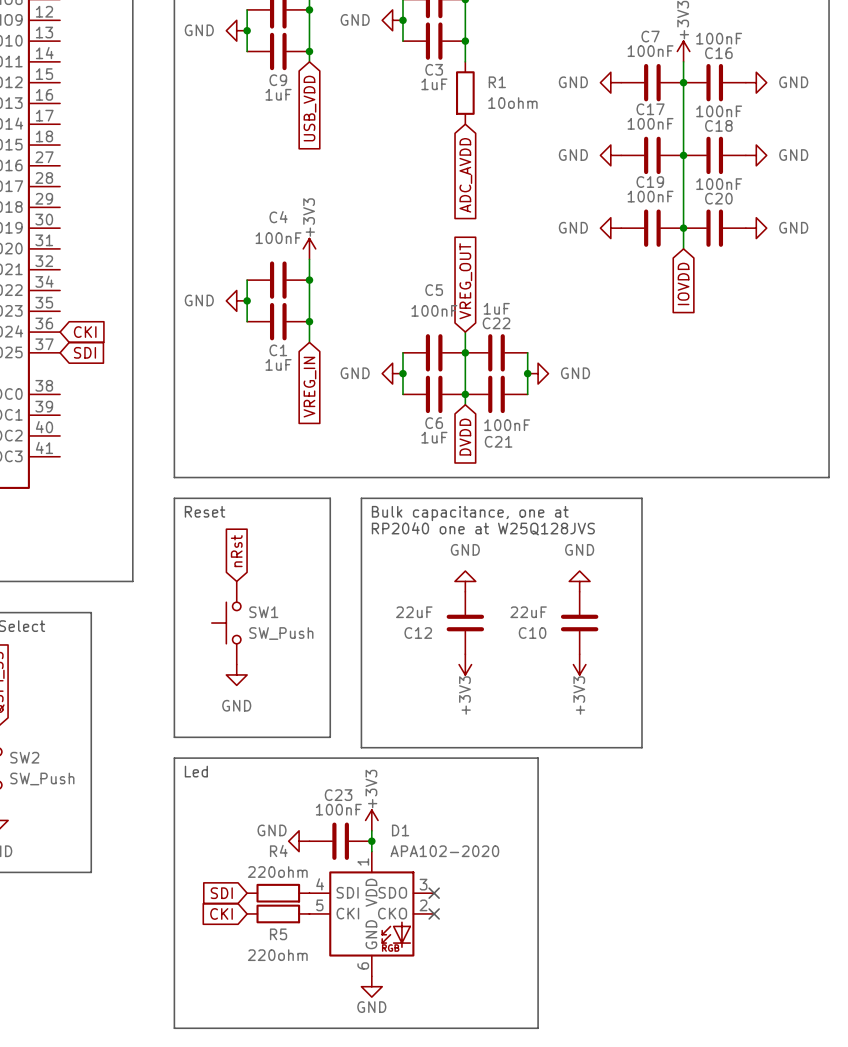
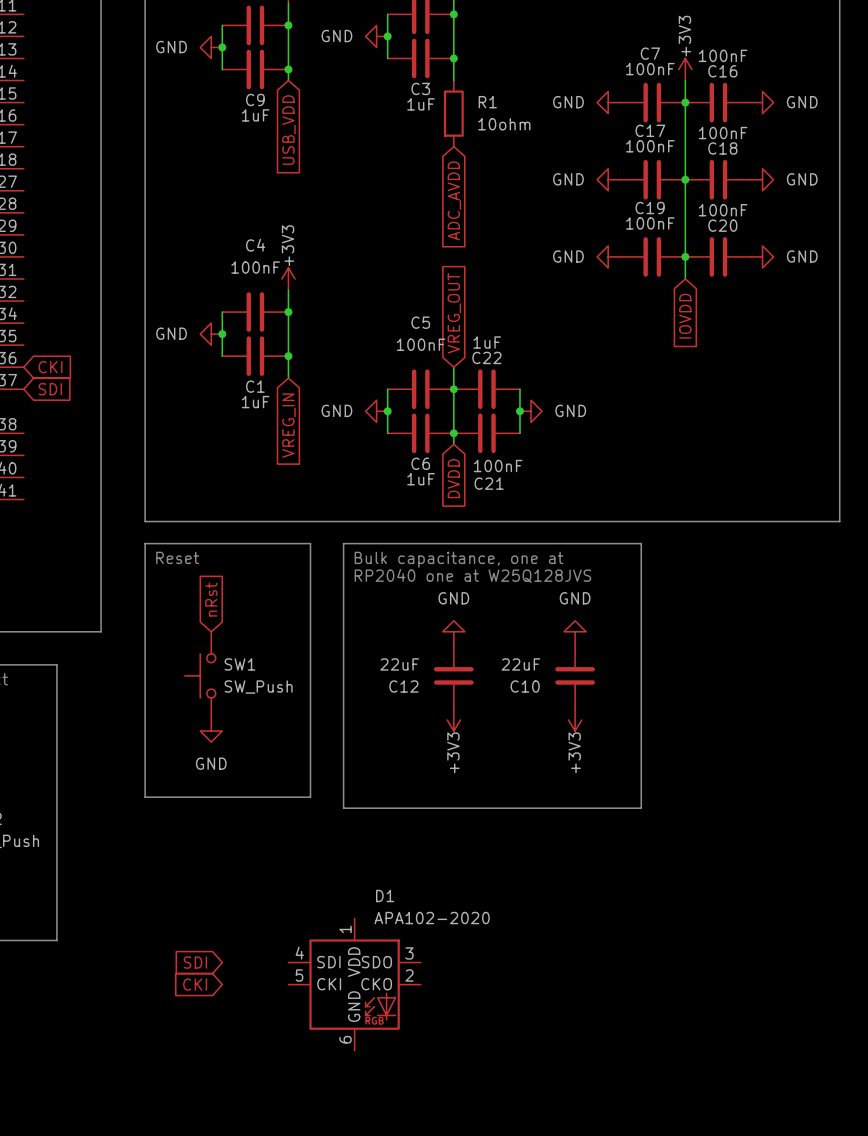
line: (174, 758) (174, 1028) (538, 1028) (538, 758) (174, 758) -> none
text: Led (196, 771) -> none
power symbol: +3V3 (371, 820) -> none
wire: (371, 830) (371, 851) -> none
power symbol: GND (299, 841) -> none
C23: 100nF (340, 841) -> none
junction: (371, 841) -> none
R4: 220ohm (278, 893) -> none
no-connect mark: (434, 893) -> none
R5: 220ohm (278, 913) -> none
no-connect mark: (434, 913) -> none
power symbol: GND (371, 986) -> none

